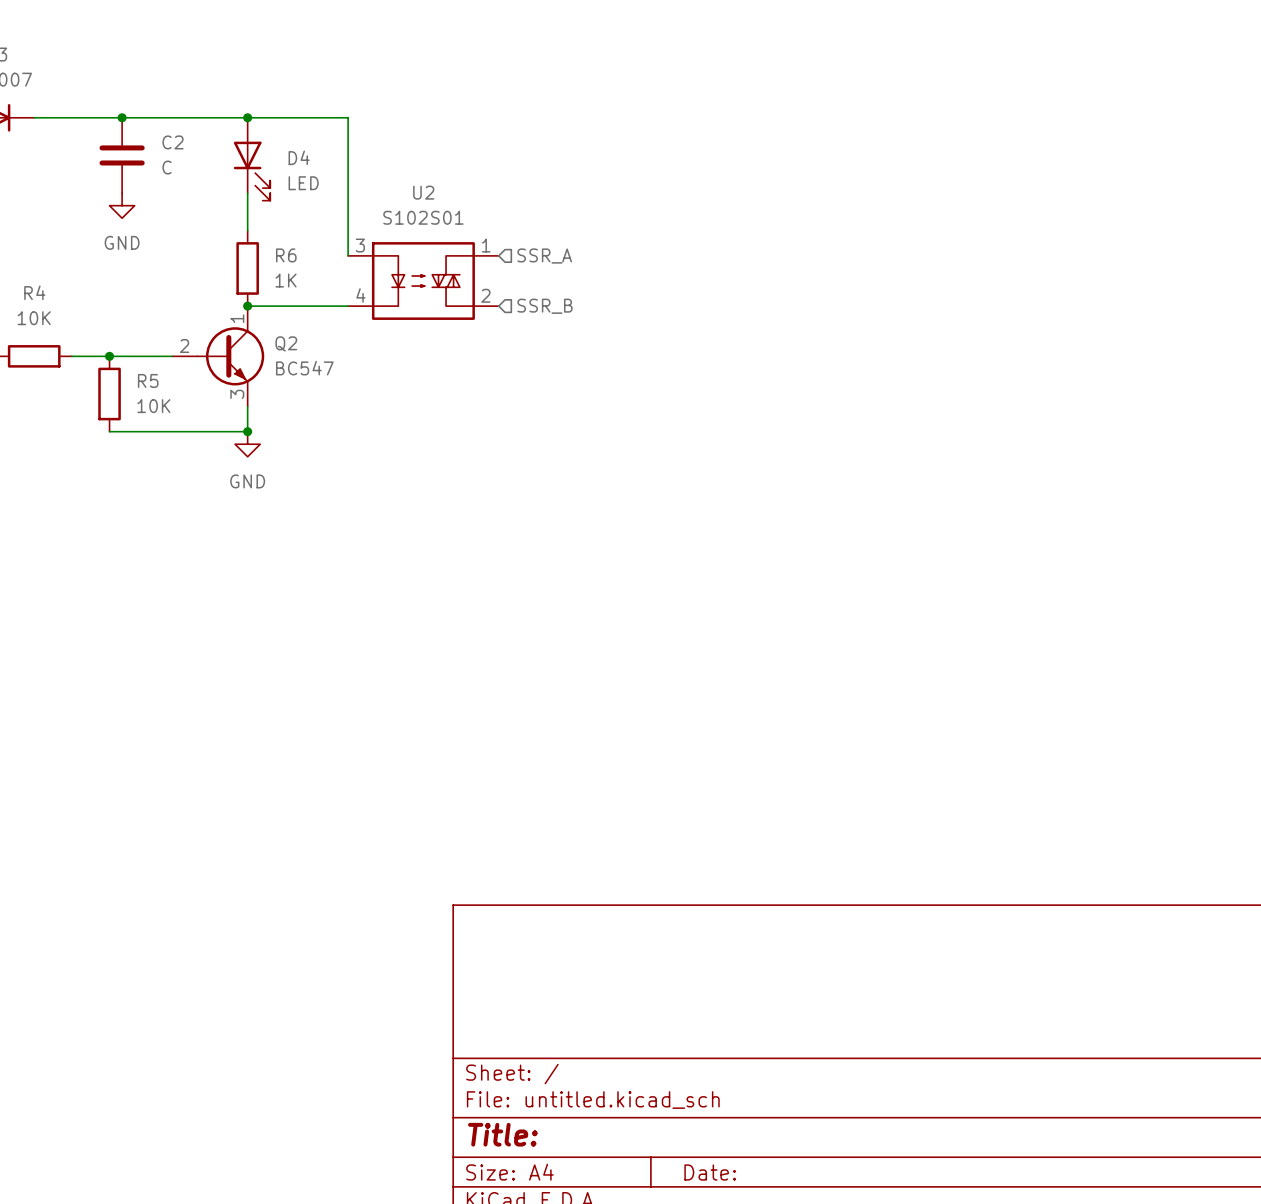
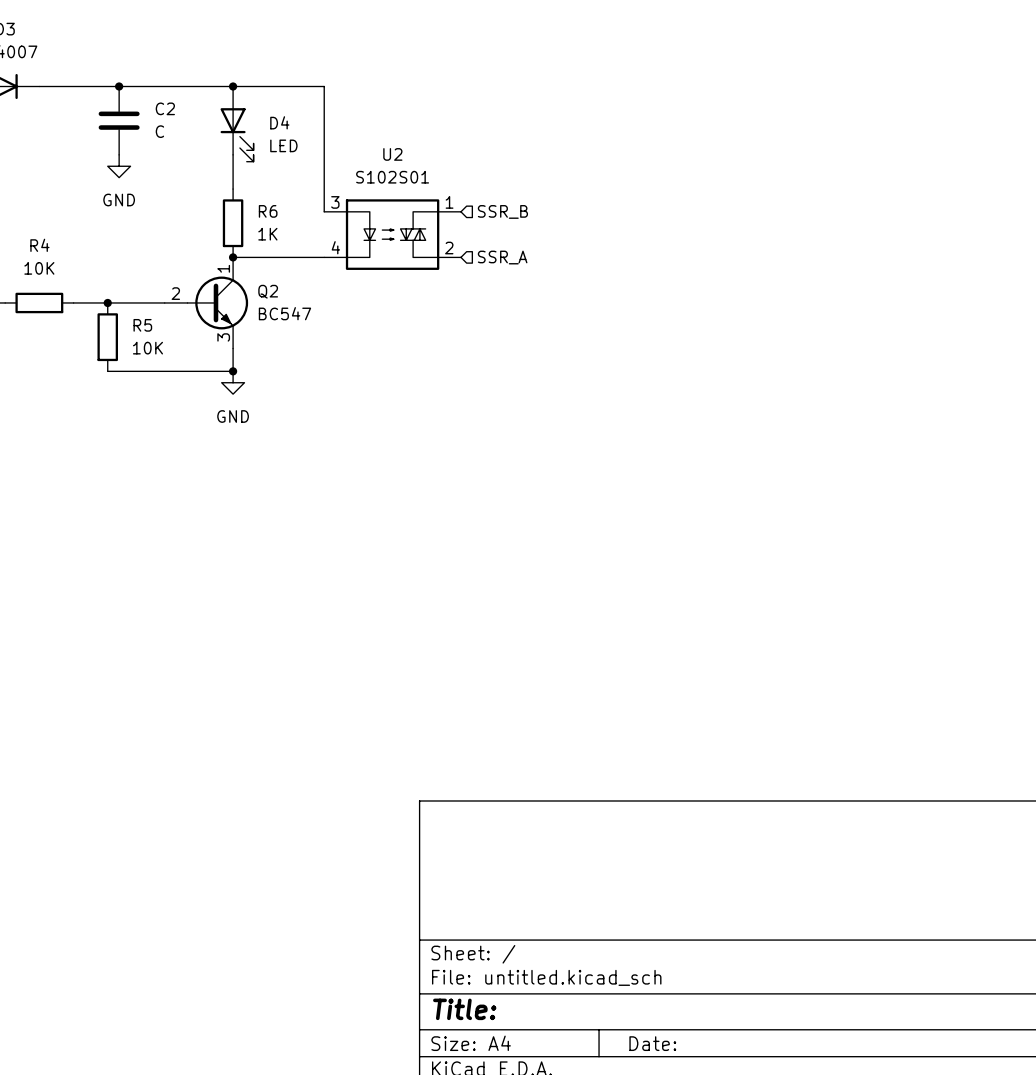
hierarchical label: SSR_A (544, 256) -> SSR_B (502, 211)
hierarchical label: SSR_B (544, 306) -> SSR_A (502, 257)

